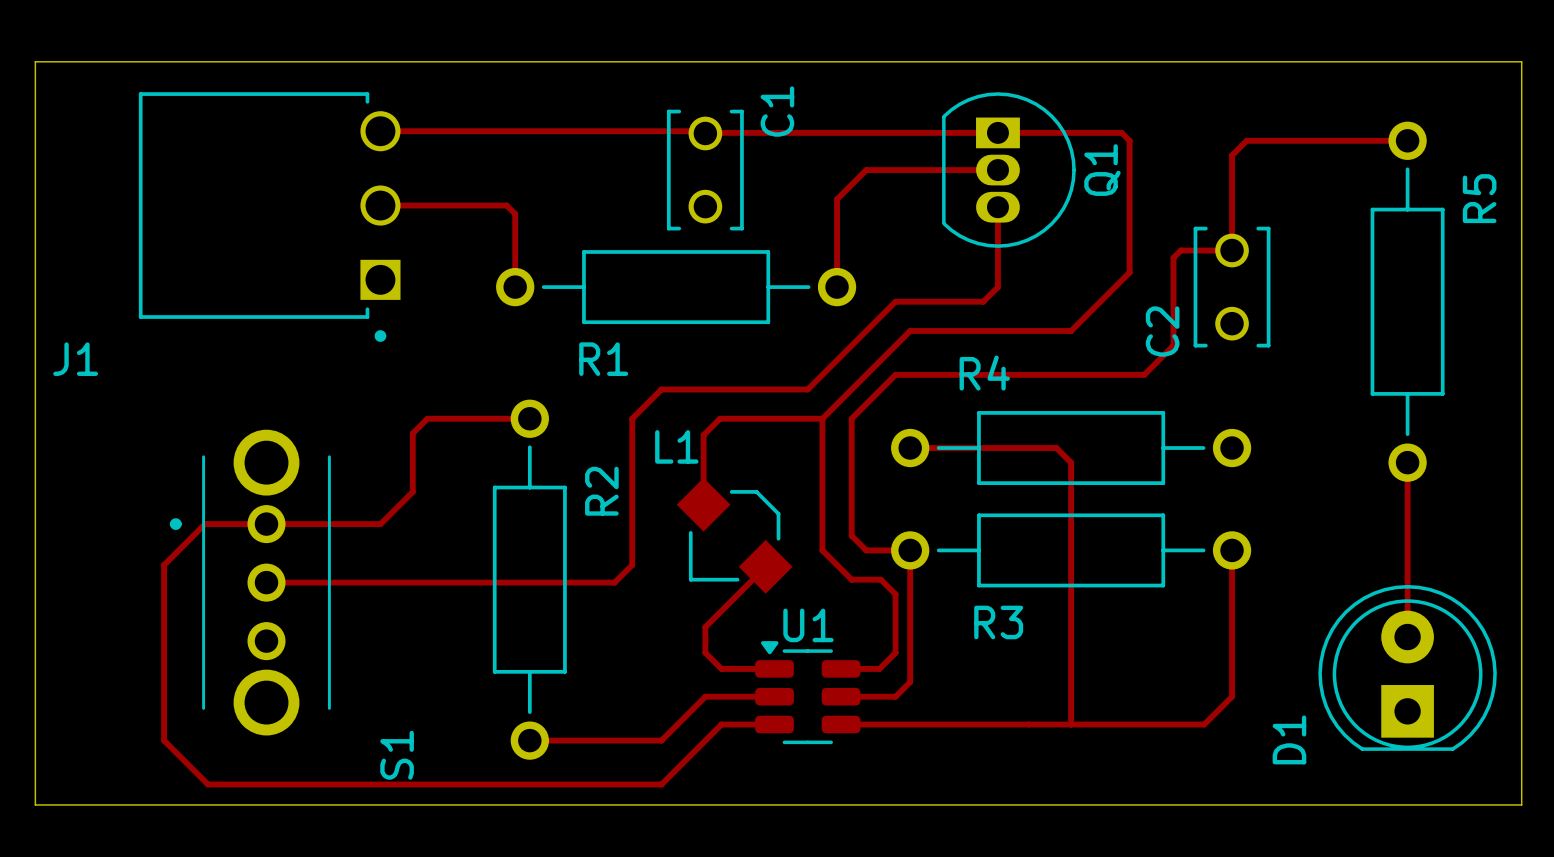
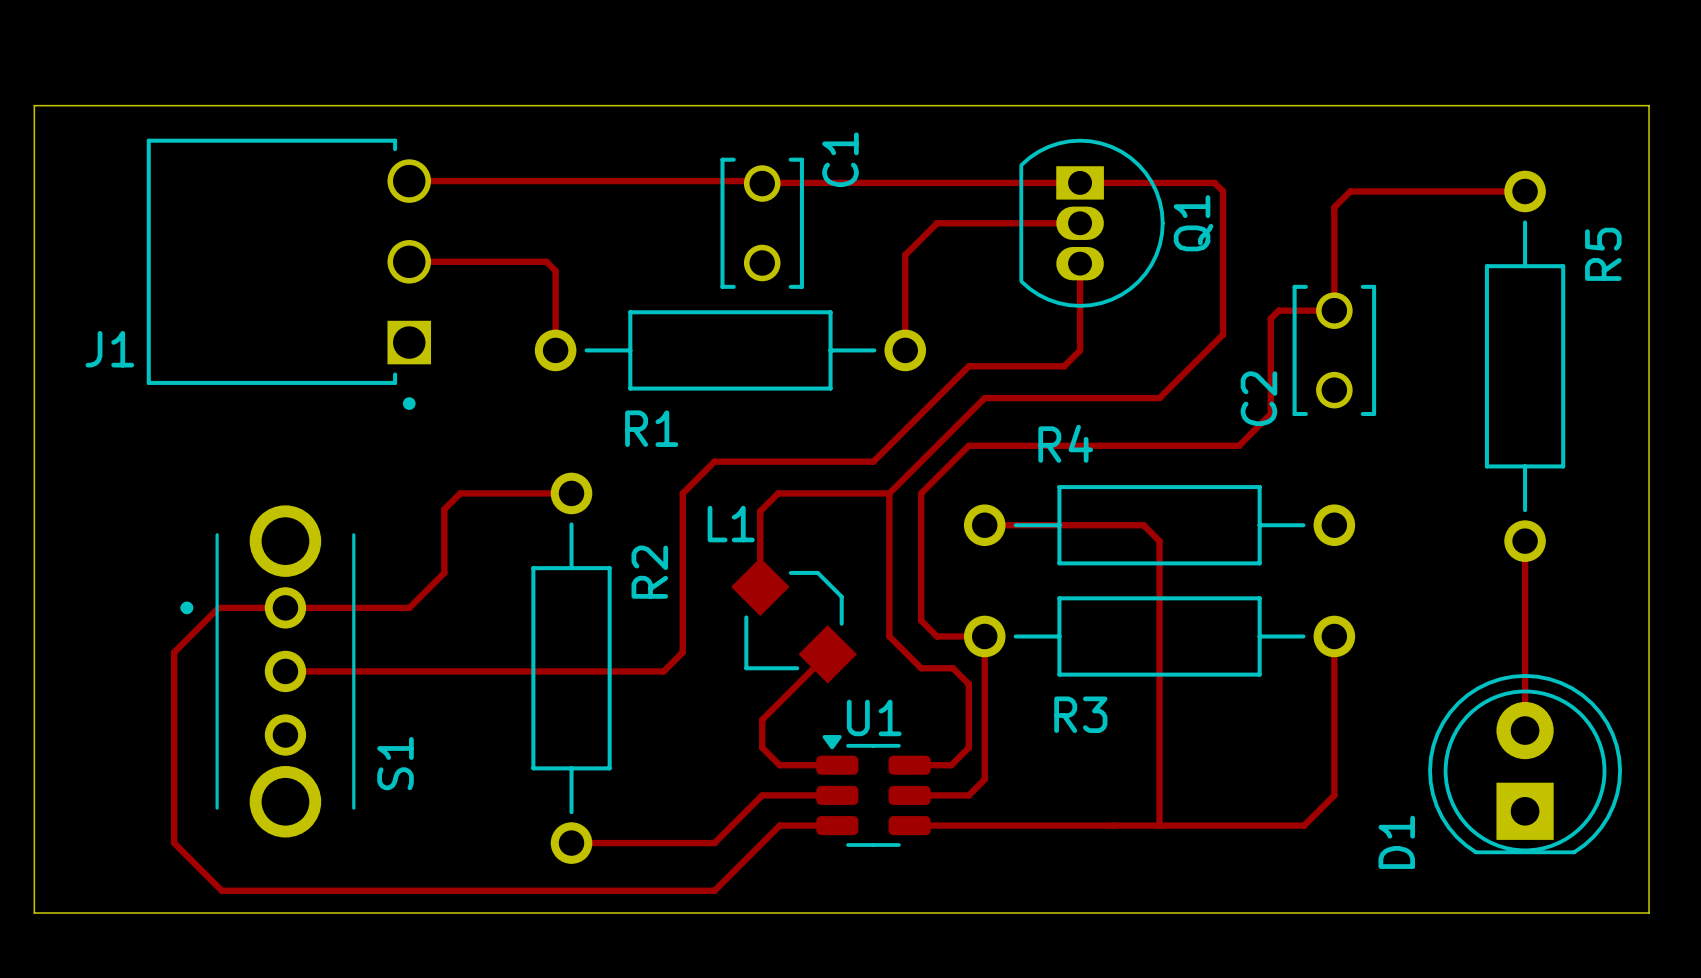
J1 name position: J1 (75, 359) -> J1 (109, 349)
S1 name position: S1 (397, 755) -> S1 (395, 763)

